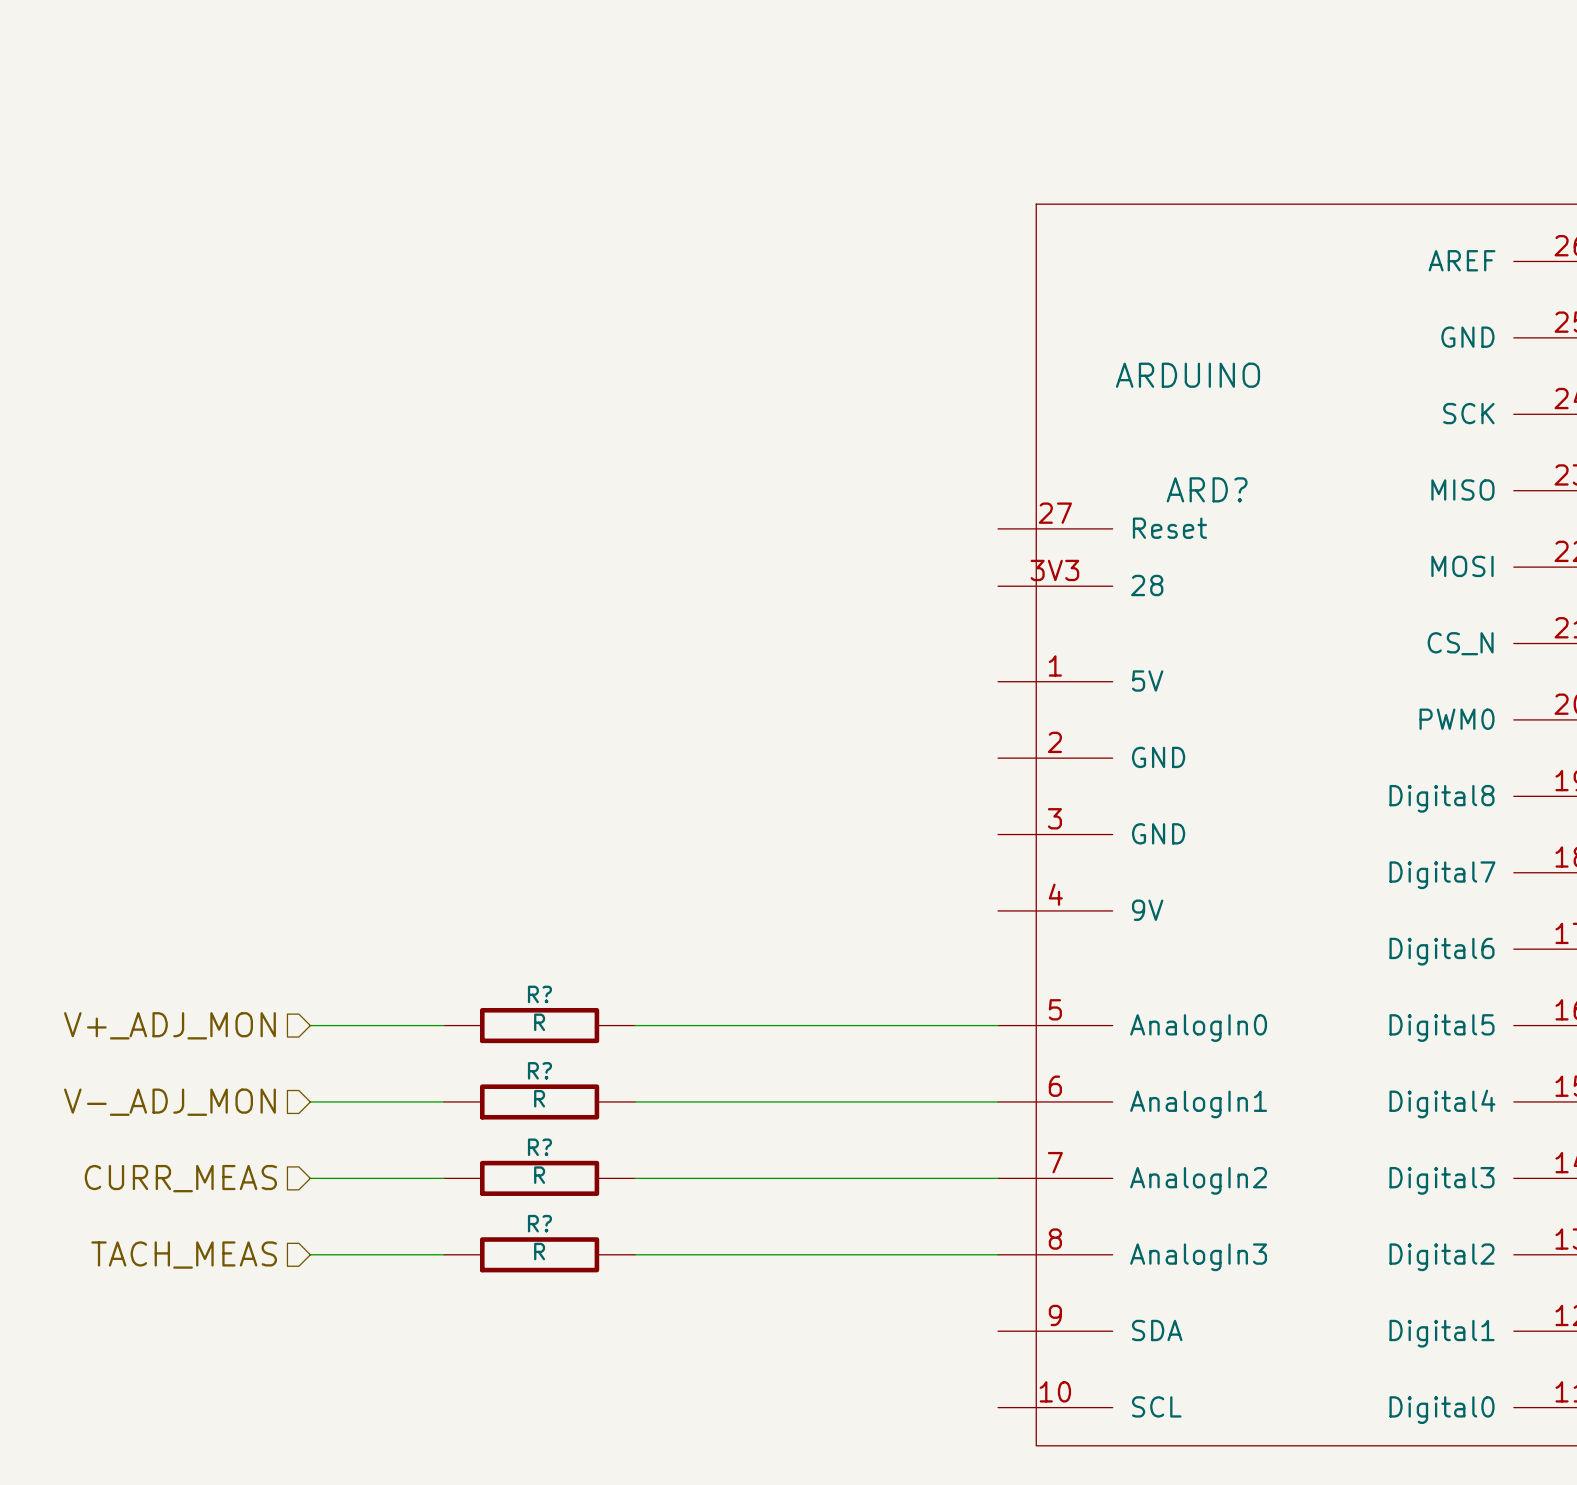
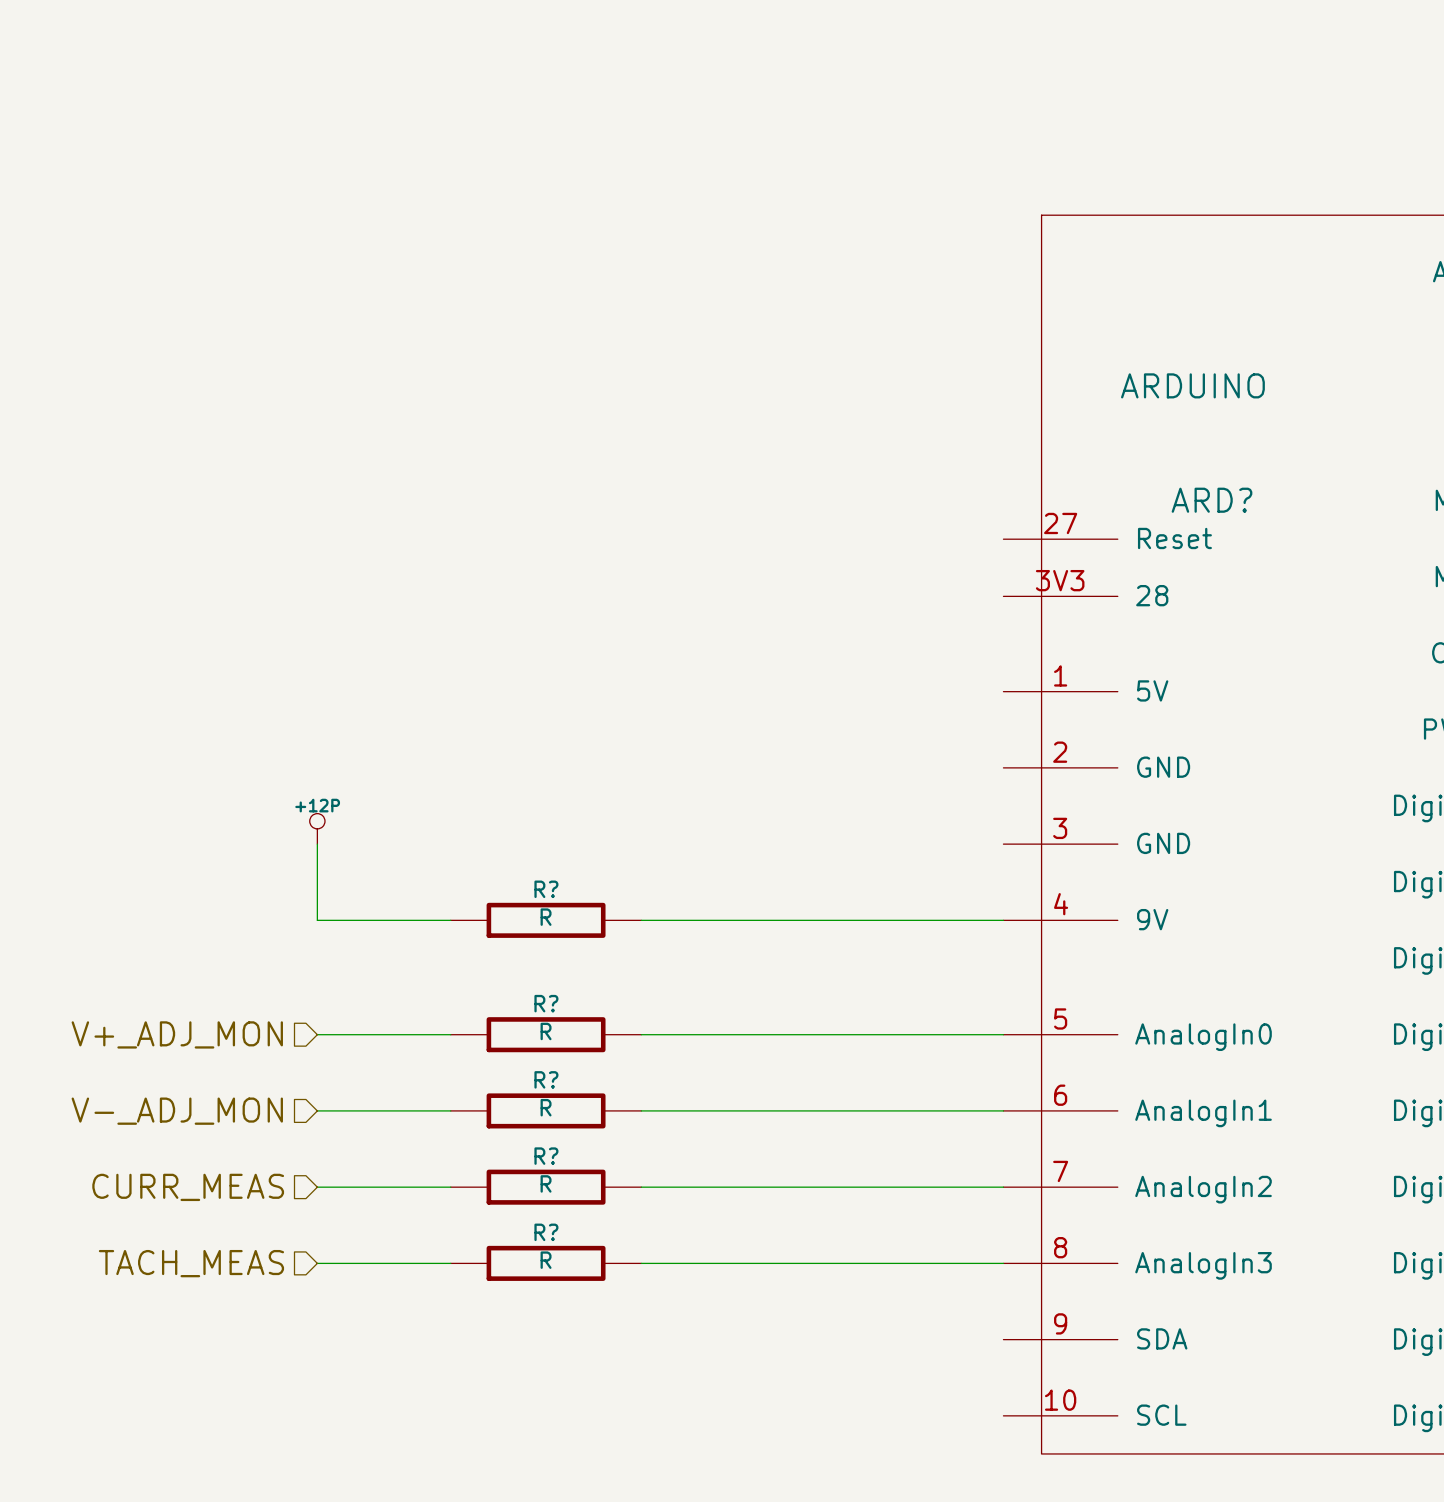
power symbol: none -> +12P (317, 828)
wire: none -> (317, 844) (317, 920) (450, 920)
R?: none -> R (546, 920)
wire: none -> (641, 920) (1003, 920)

